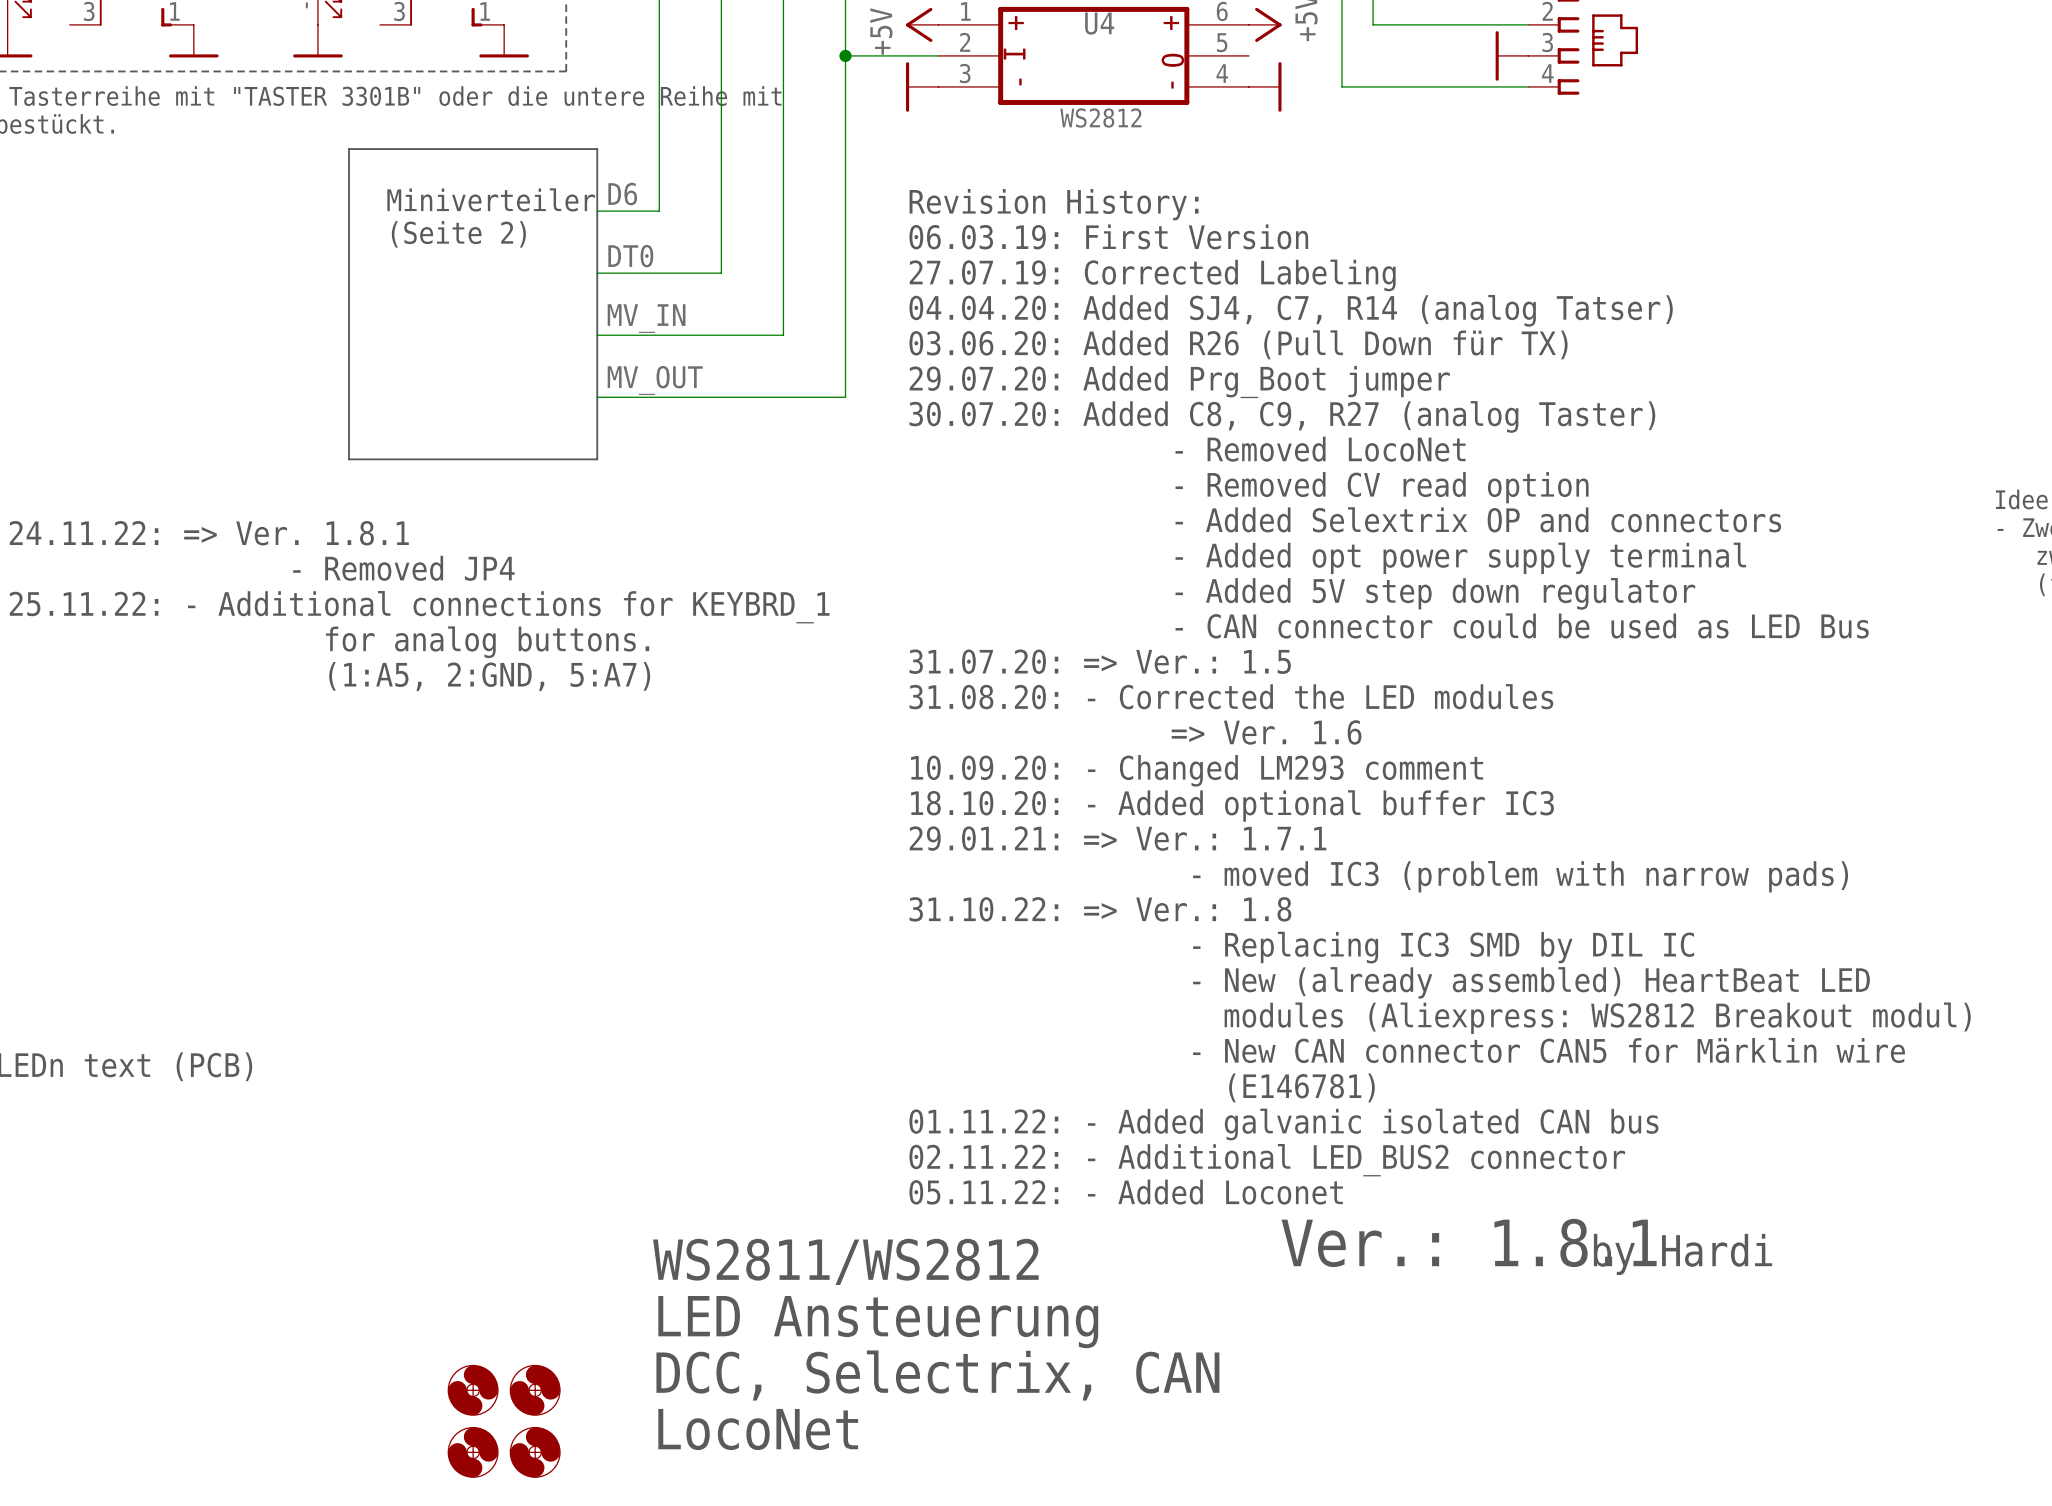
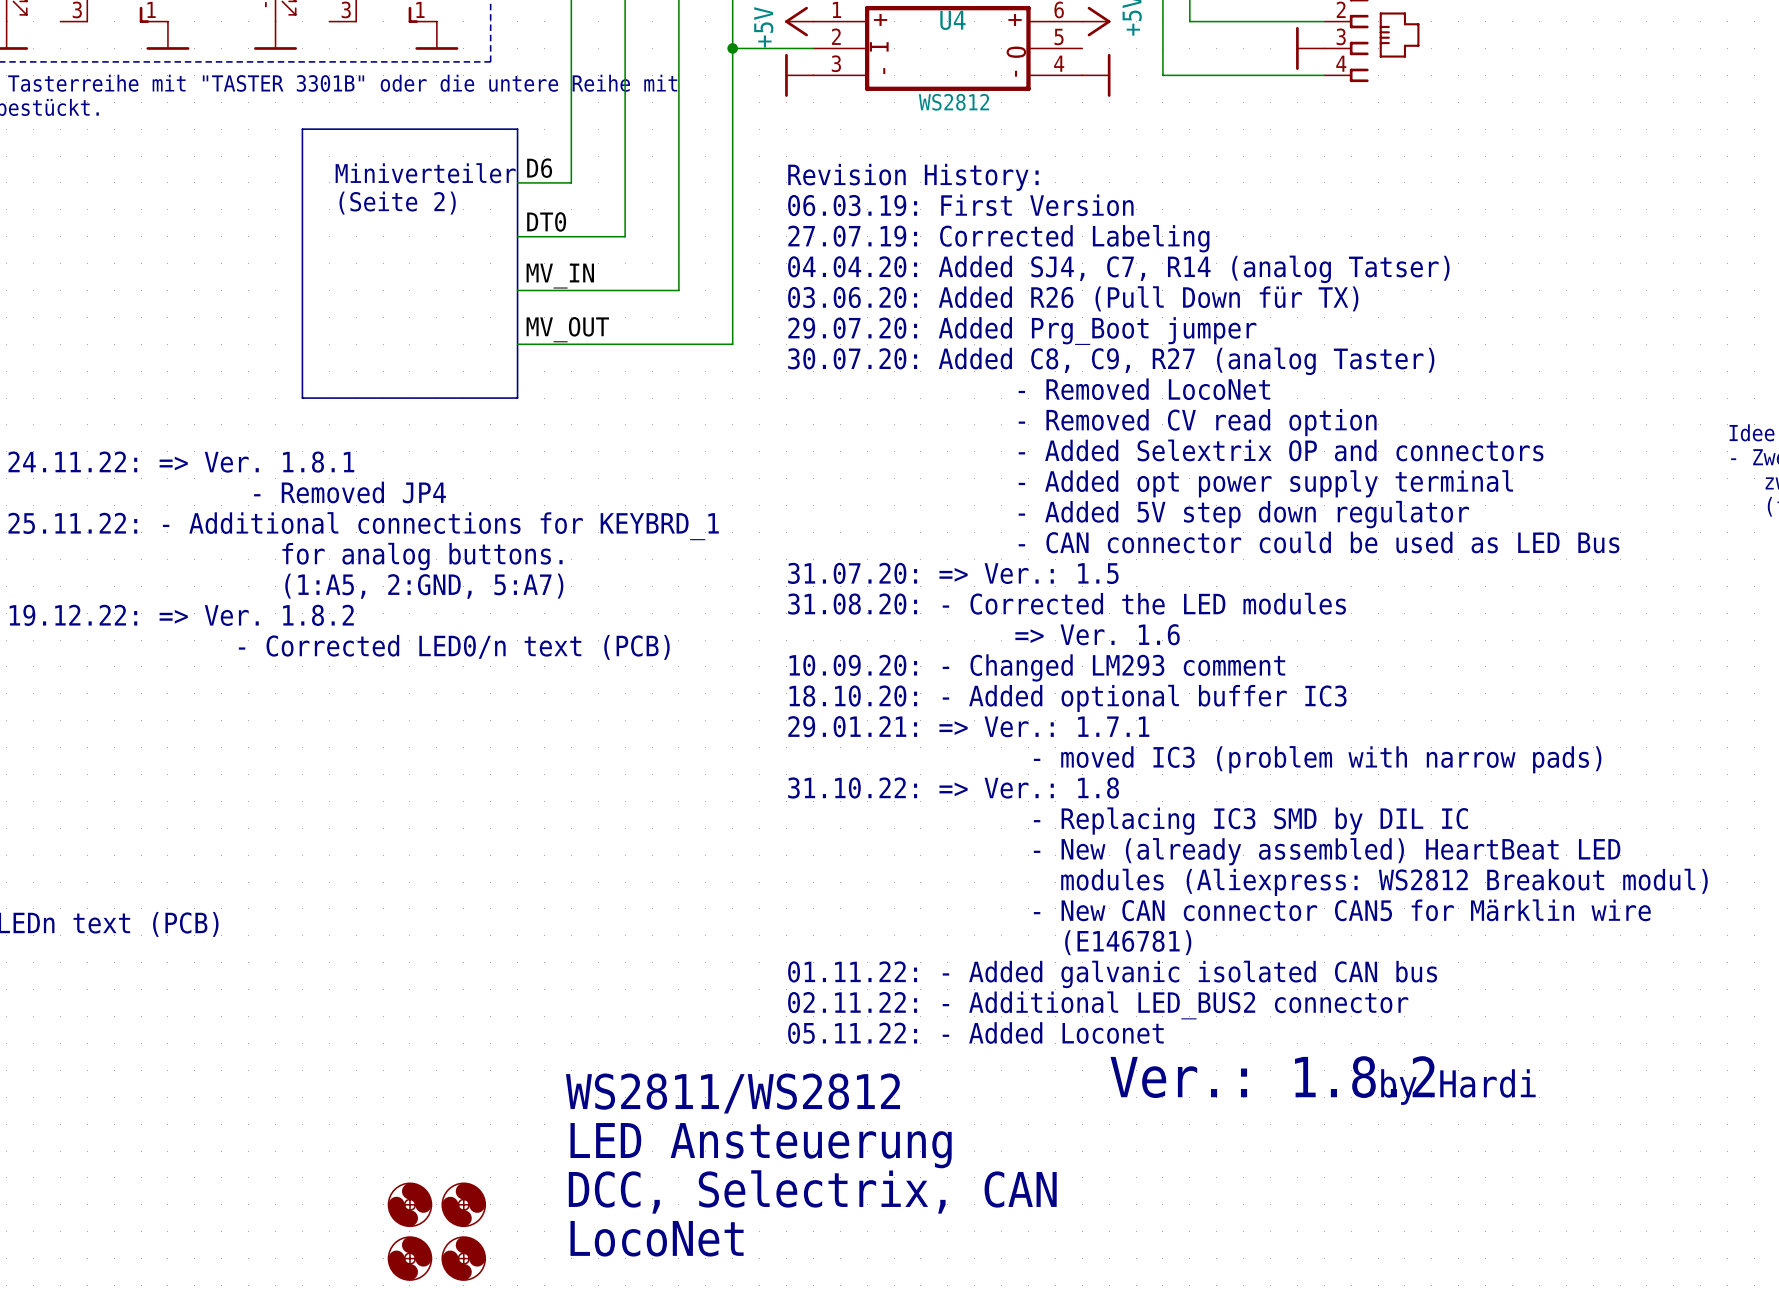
text: none -> 19.12.22: => Ver. 1.8.2 (181, 615)
text: none -> - Corrected LED0/n text (PCB) (454, 647)
text: Ver.: 1.8.1 (1469, 1242) -> Ver.: 1.8.2 (1272, 1077)

